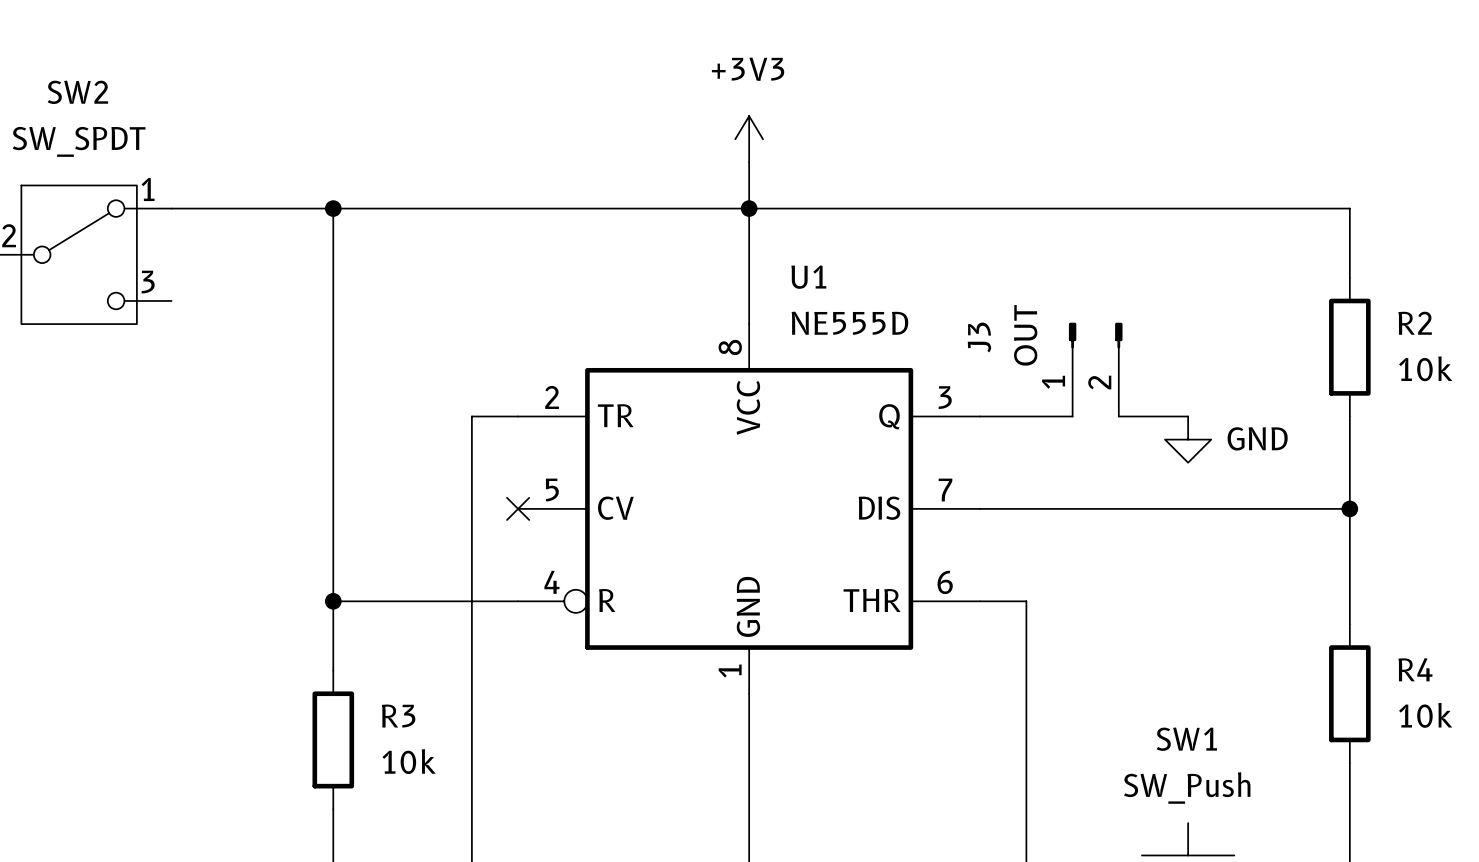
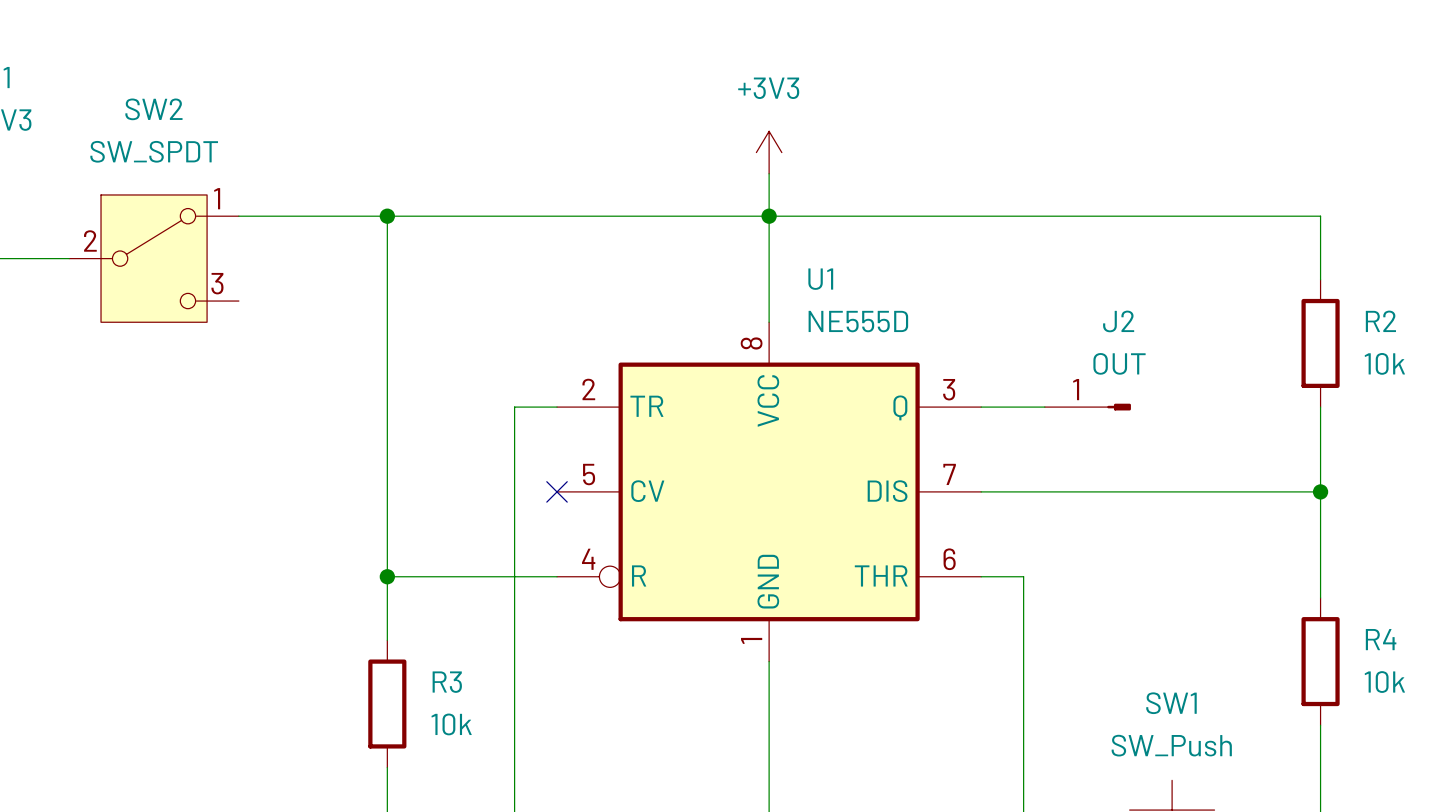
J3: OUT (1095, 369) -> none
J2: none -> OUT (1087, 407)
wire: (1118, 416) (1188, 416) -> none
power symbol: GND (1188, 439) -> none

